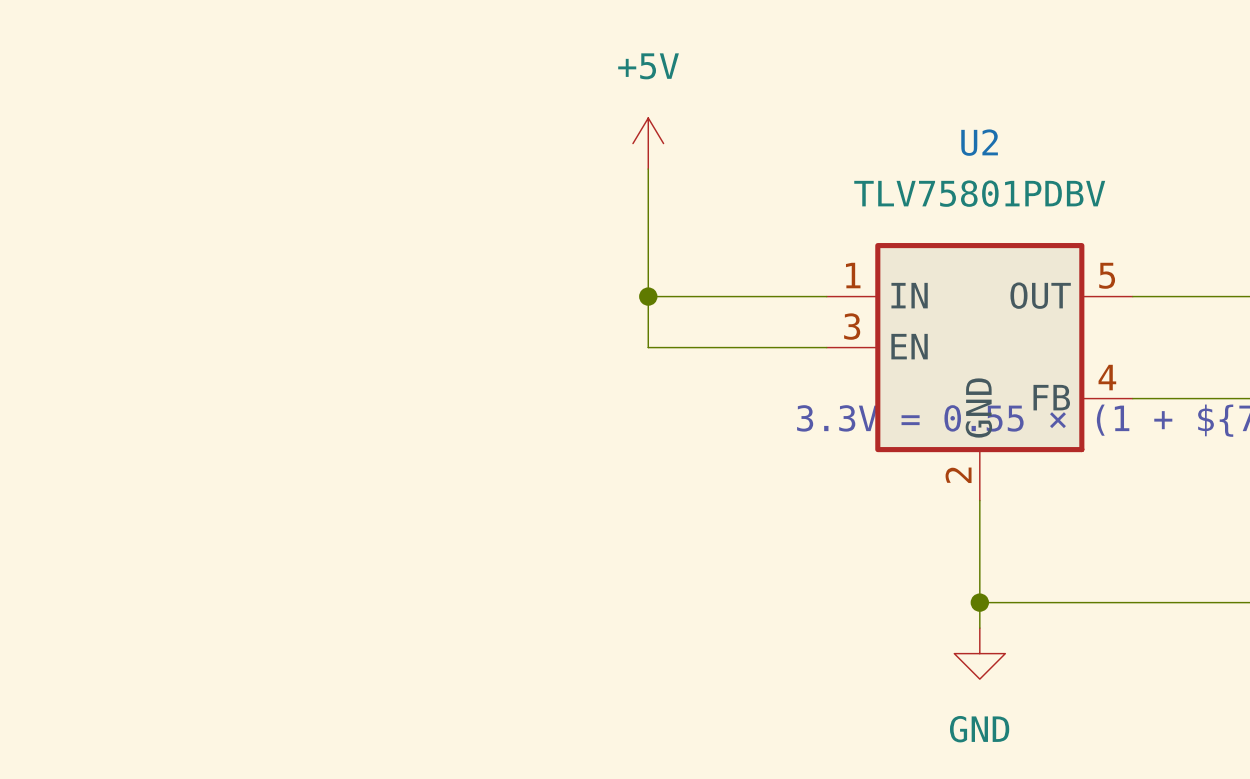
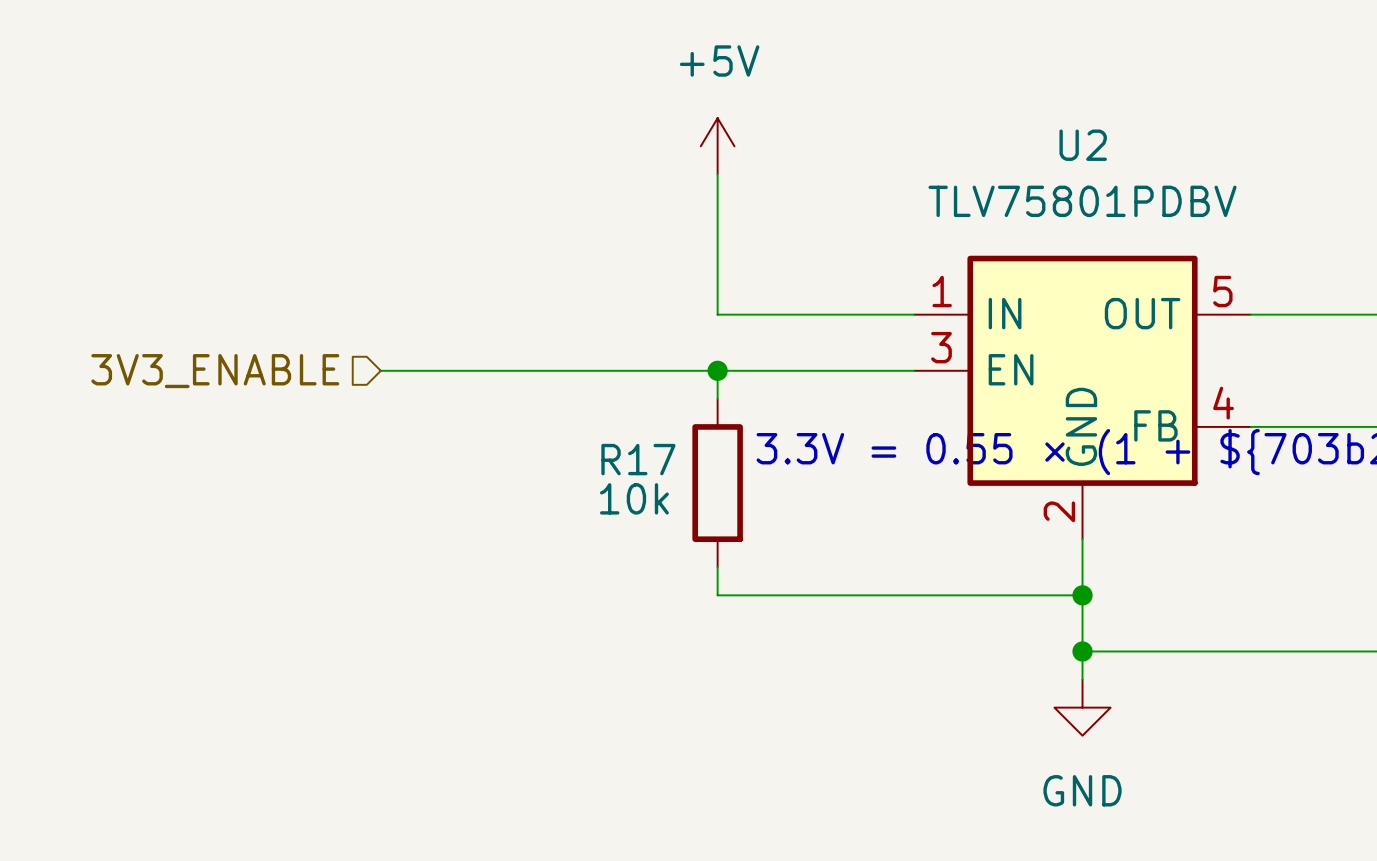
wire: (648, 296) (648, 347) -> none
junction position: (648, 296) -> (717, 370)
wire: none -> (380, 370) (717, 370) (717, 398)
hierarchical label: none -> 3V3_ENABLE (215, 371)
R17: none -> 10k (717, 483)
wire: none -> (717, 567) (717, 595) (1082, 595)
junction: none -> (1082, 595)

